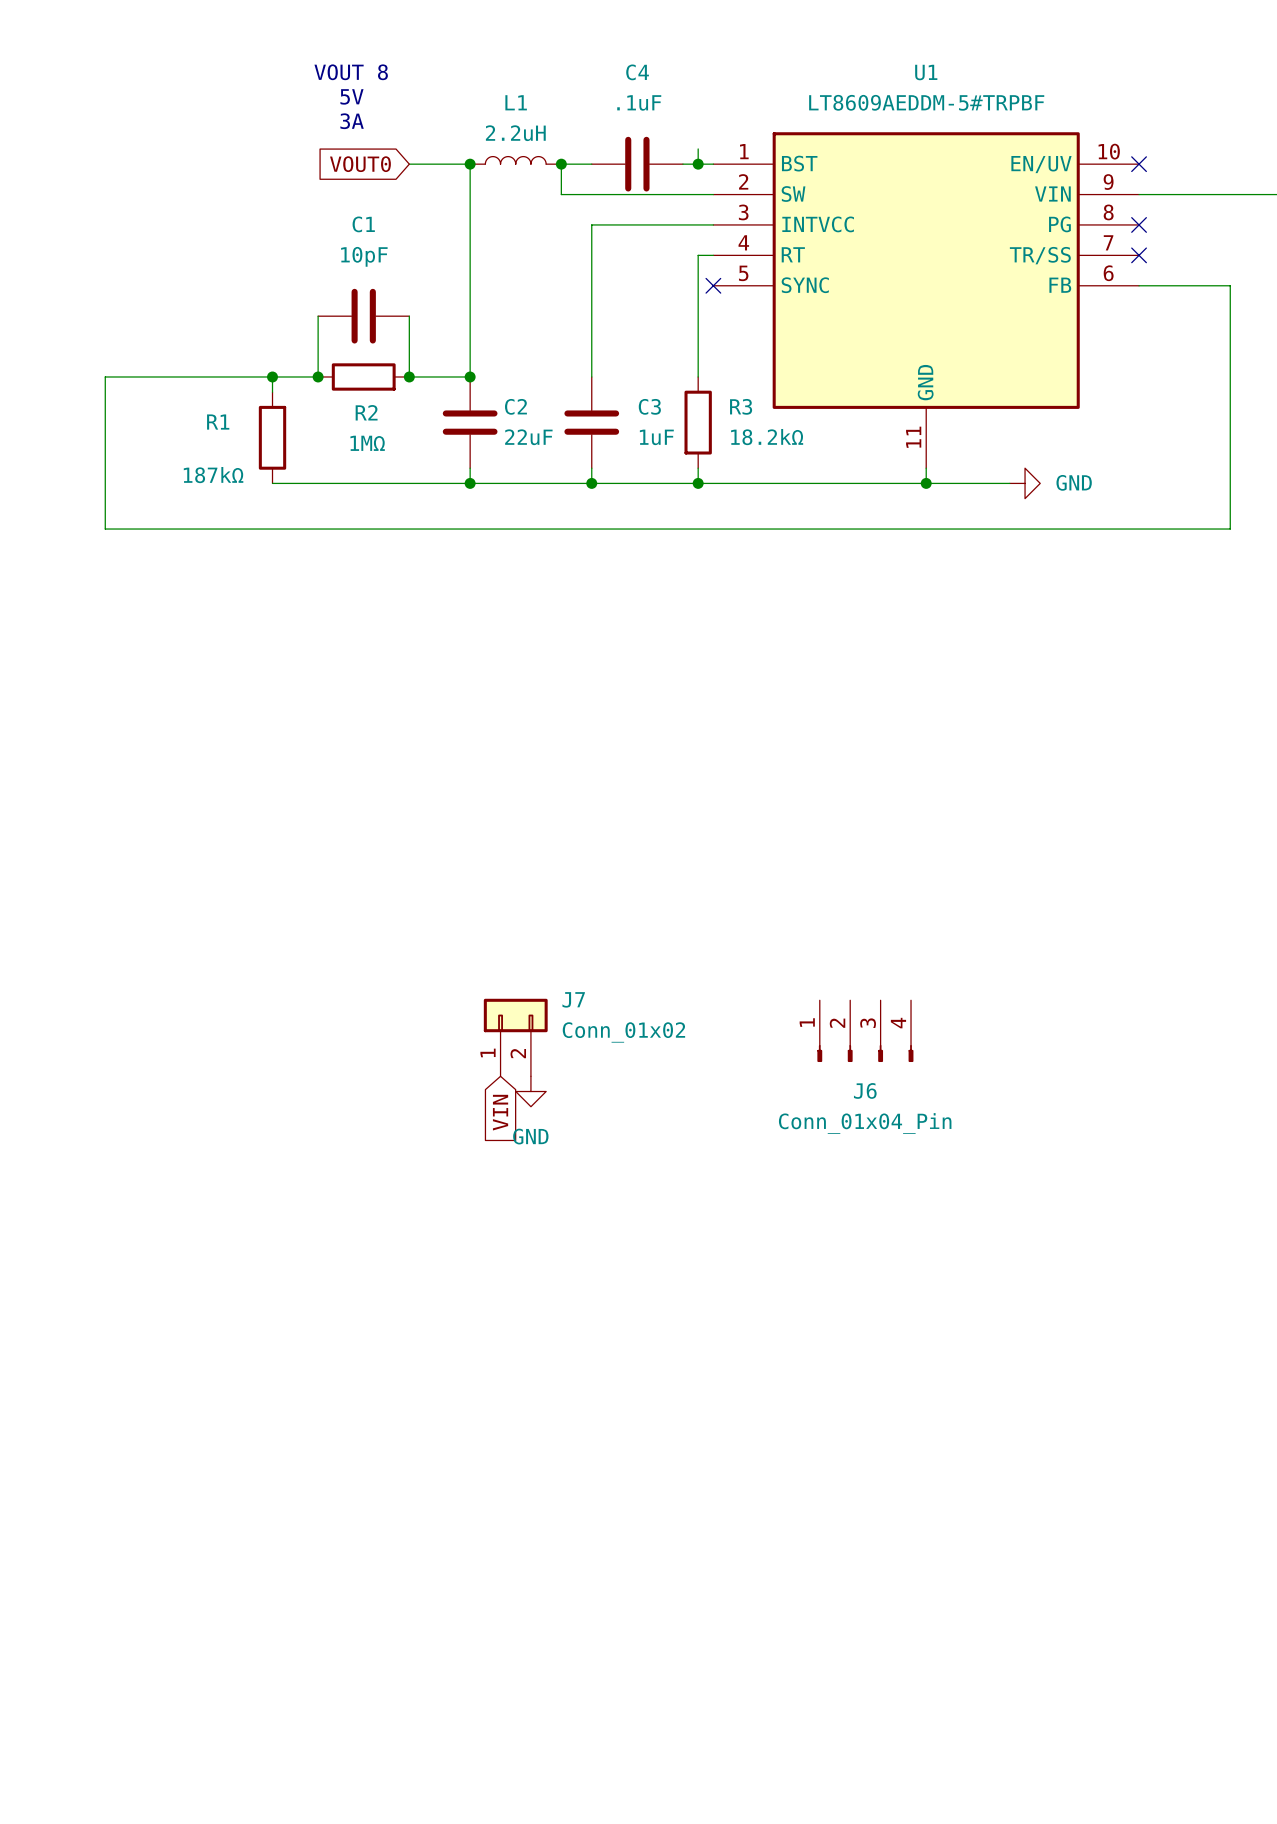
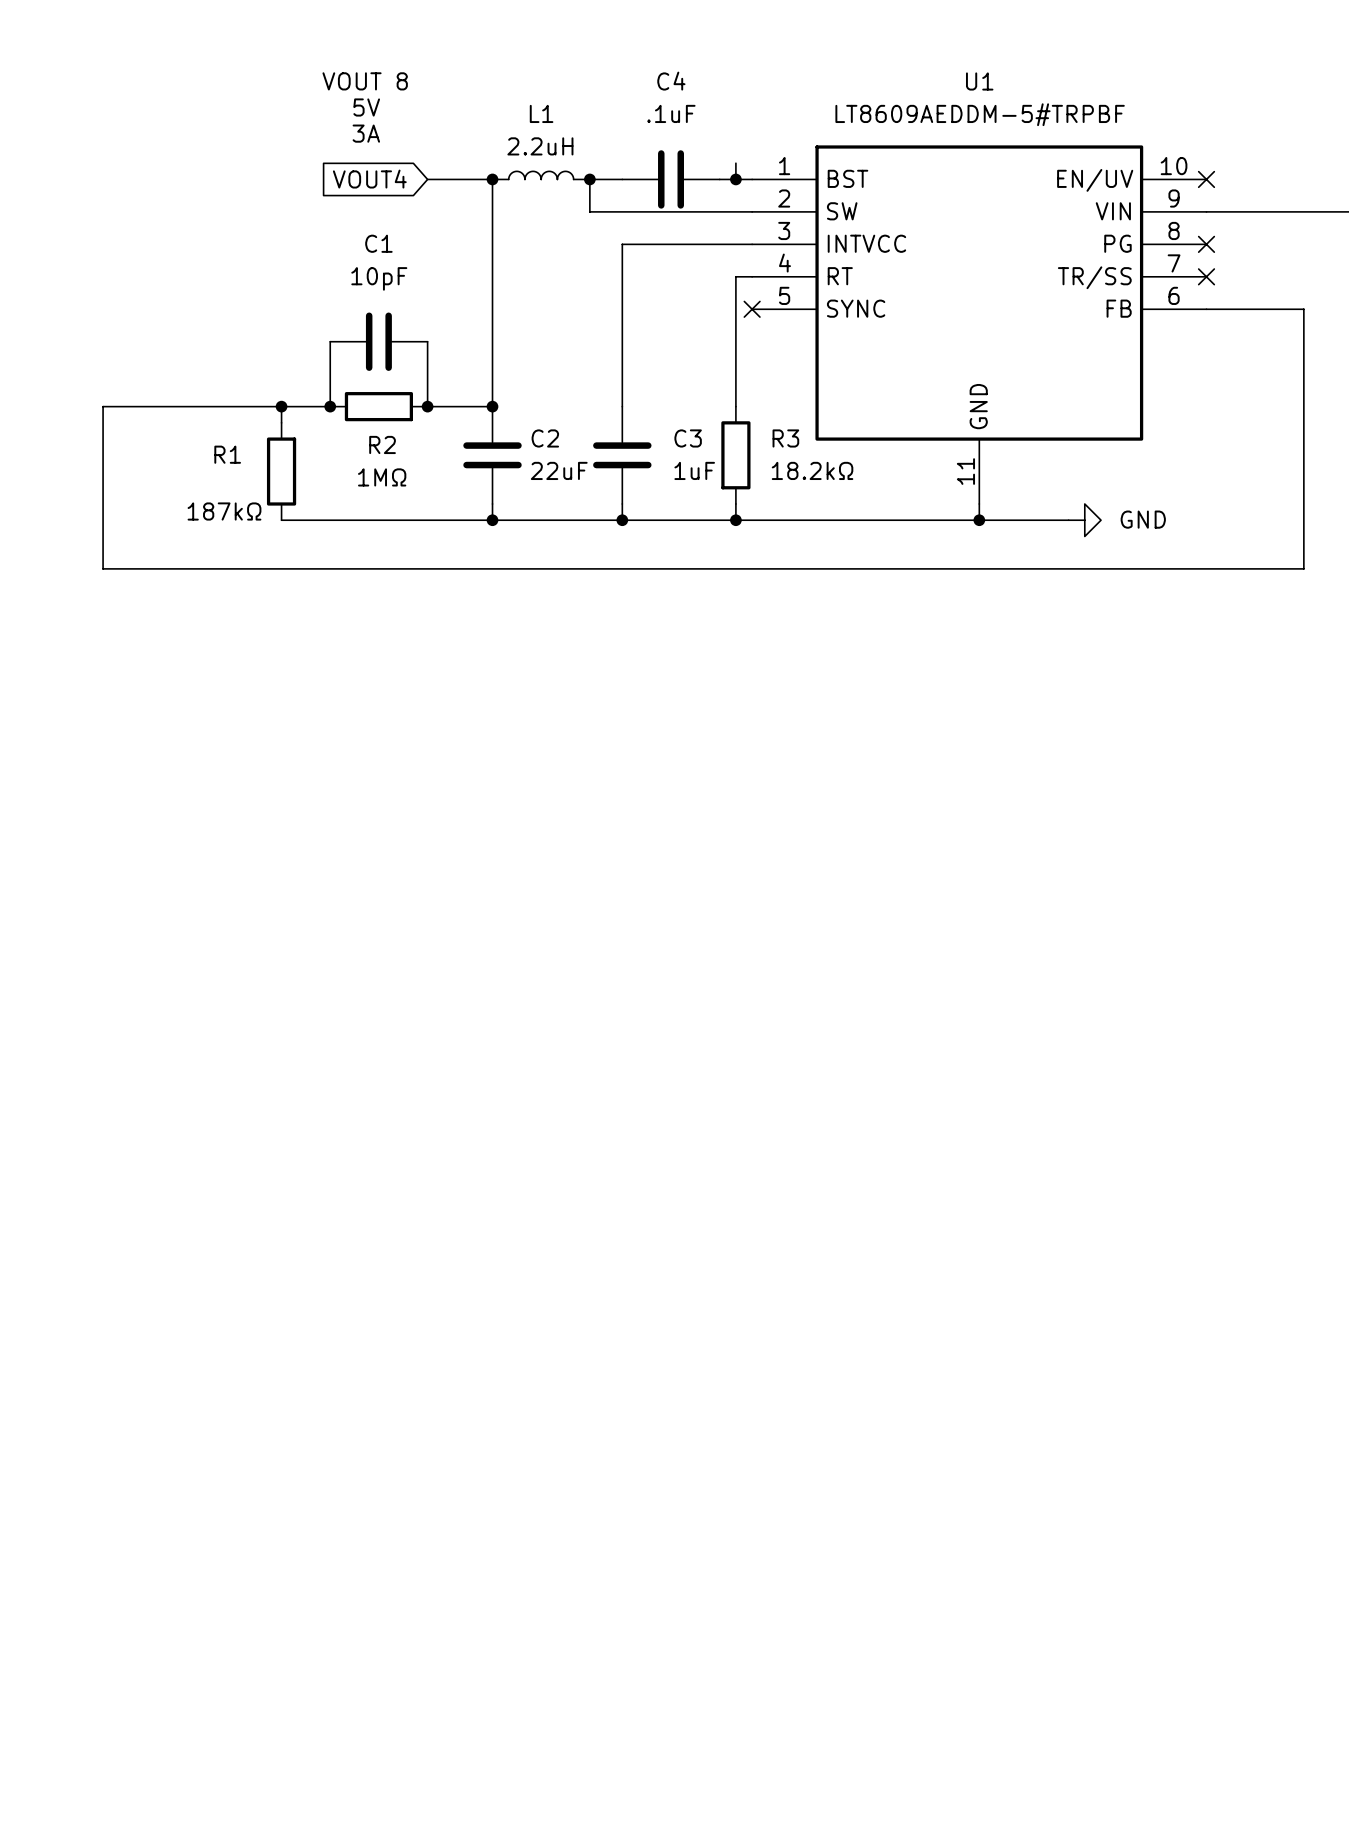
global label: VOUT0 (360, 164) -> VOUT4 (369, 179)
J6: Conn_01x04_Pin (865, 1031) -> none
J7: Conn_01x02 (515, 1037) -> none
power symbol: GND (530, 1091) -> none
global label: VIN (500, 1112) -> none

